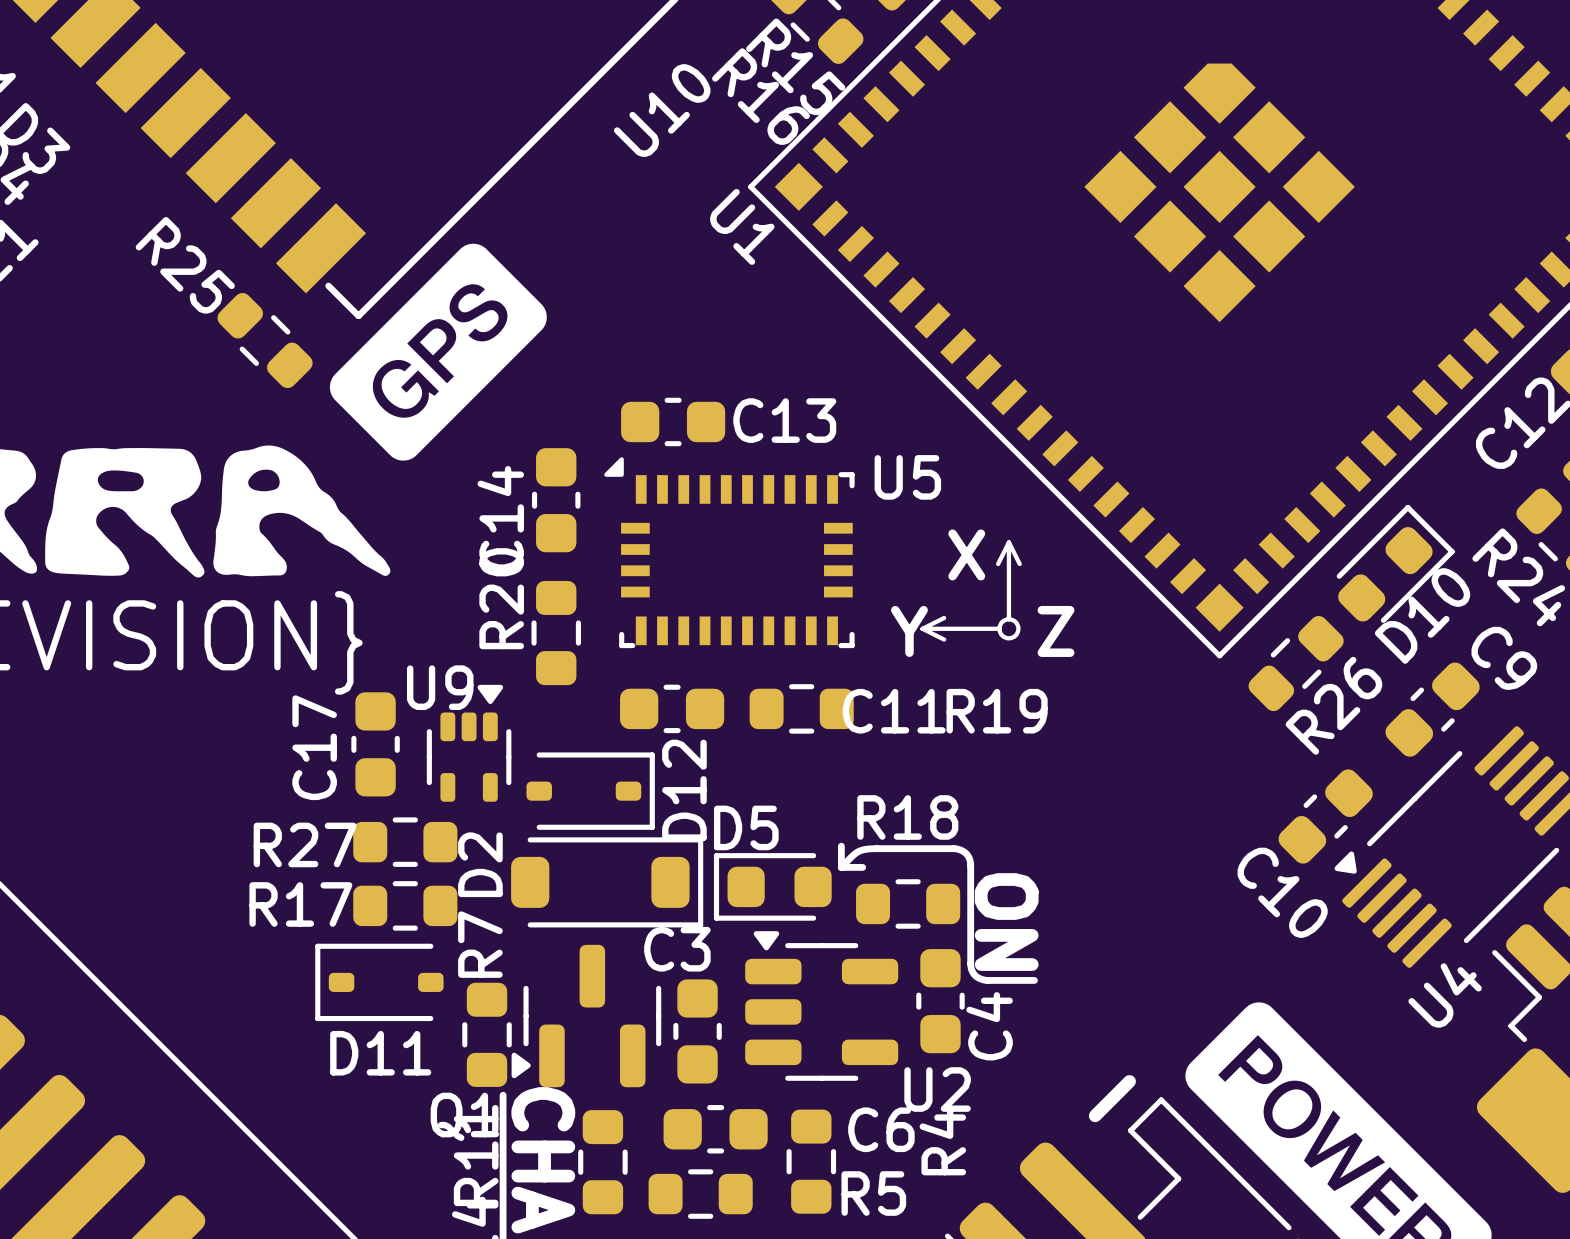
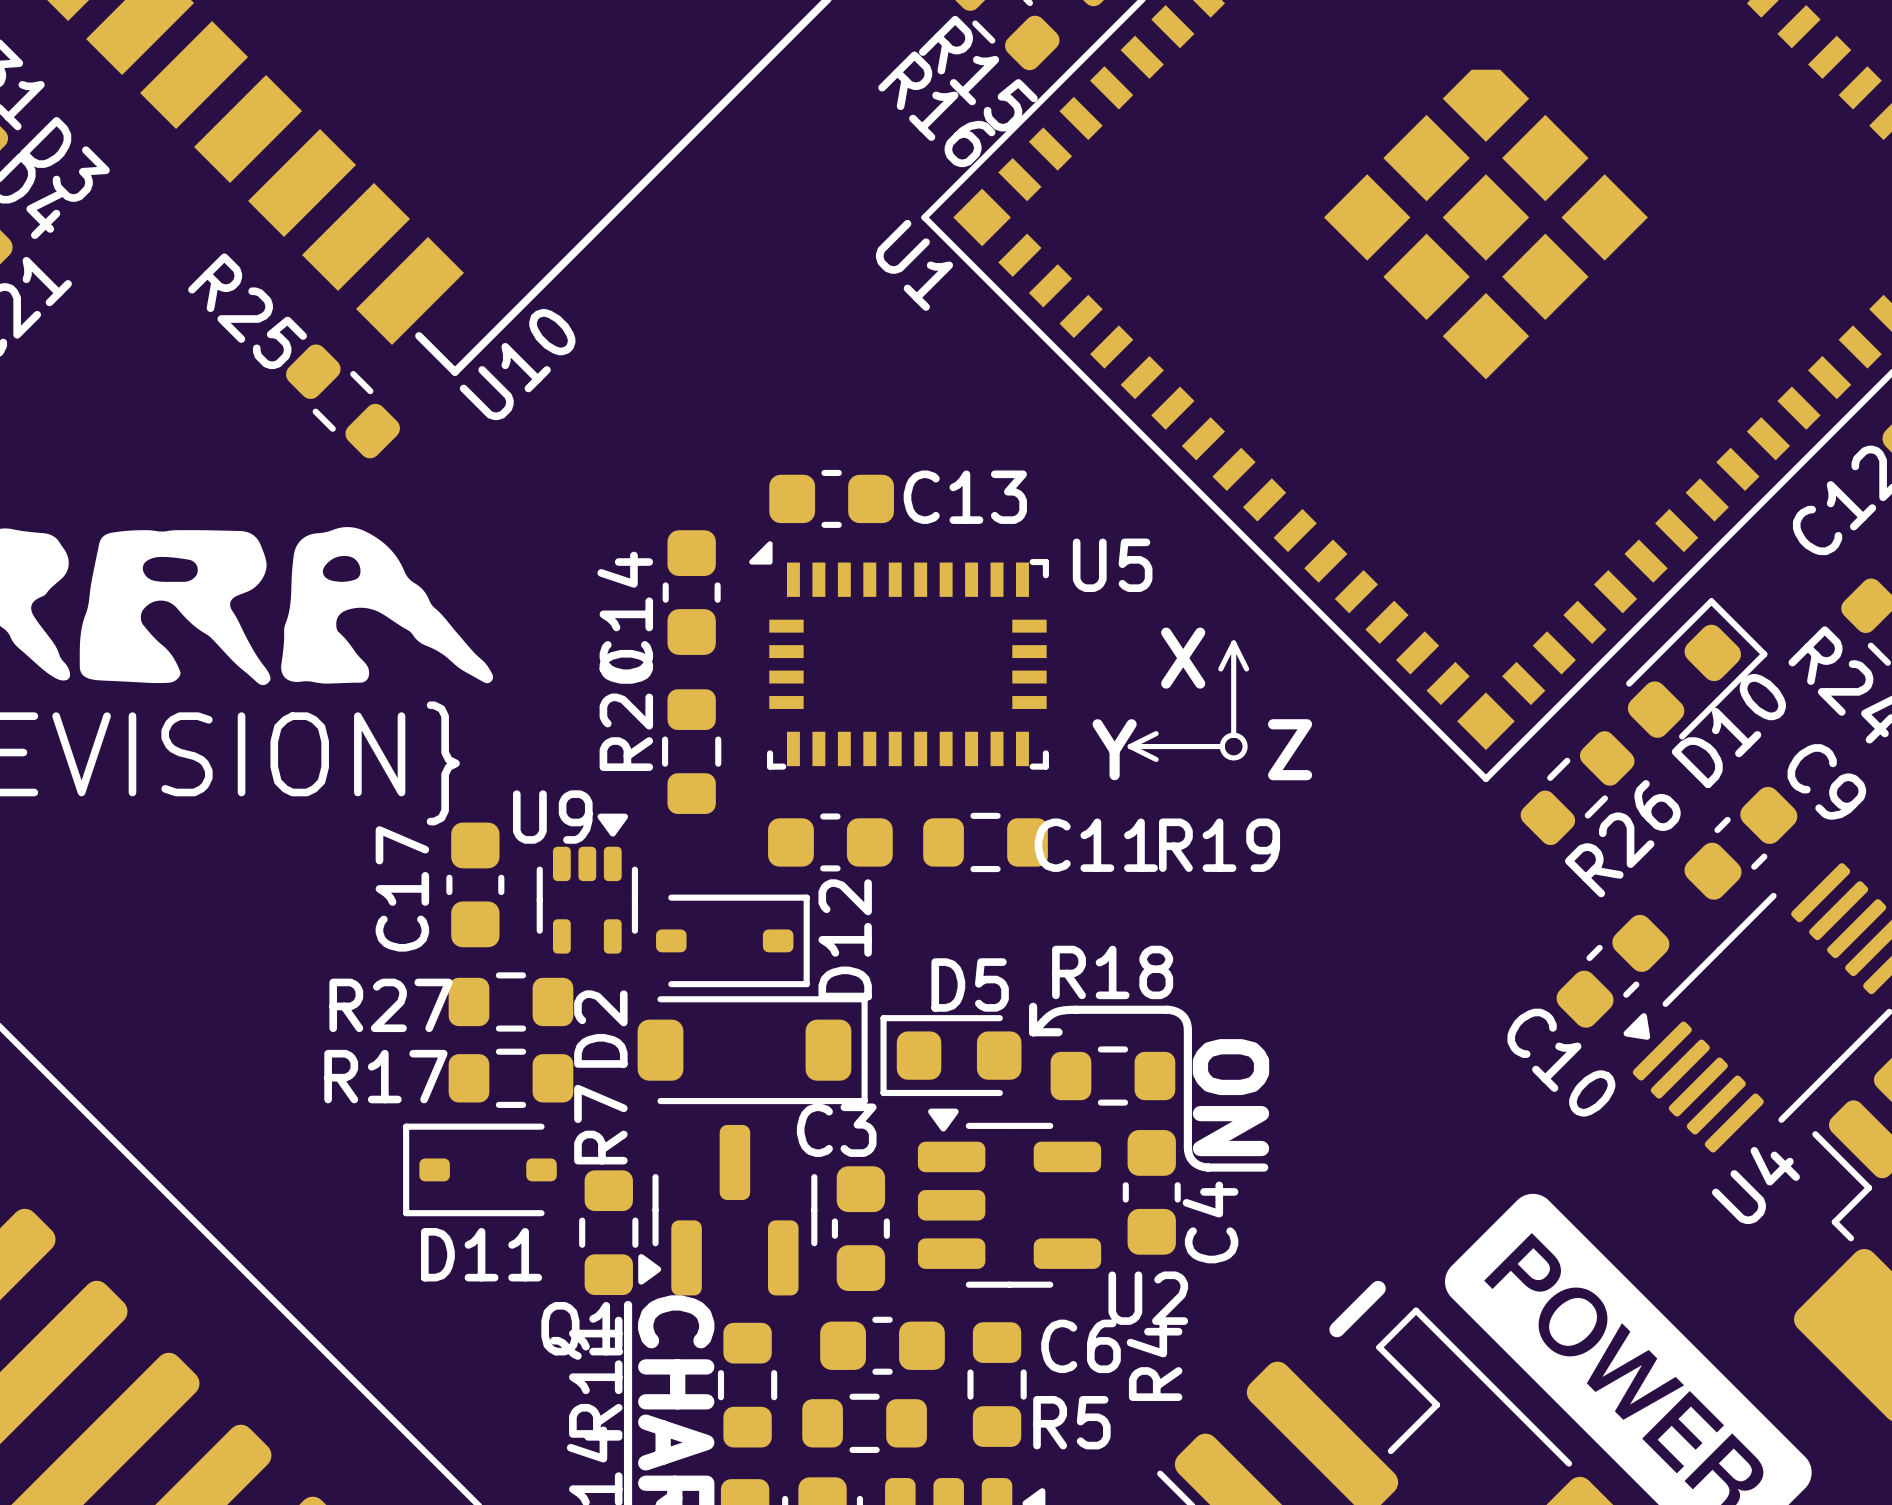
U10 name position: U10 (662, 110) -> U10 (517, 364)
drawing: [329, 243, 547, 461] -> none
D5 name position: D5 (746, 827) -> D5 (970, 984)

